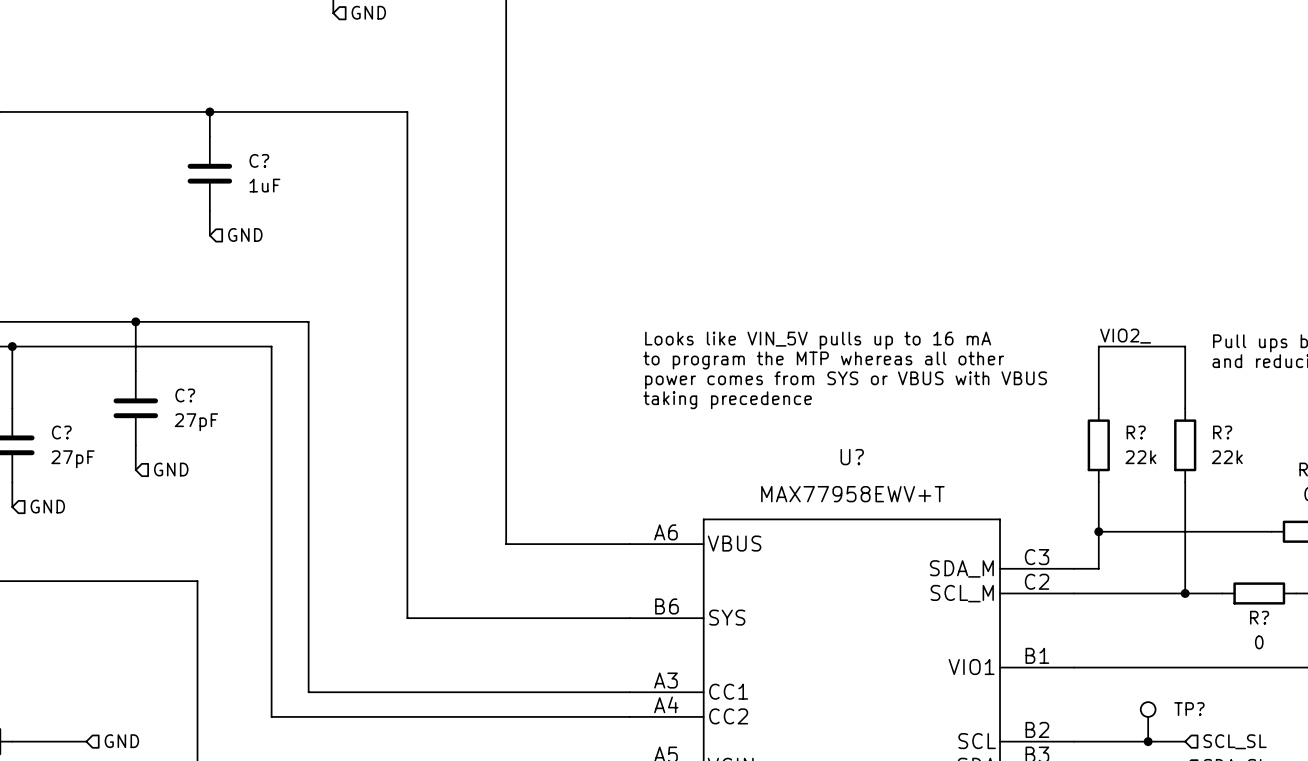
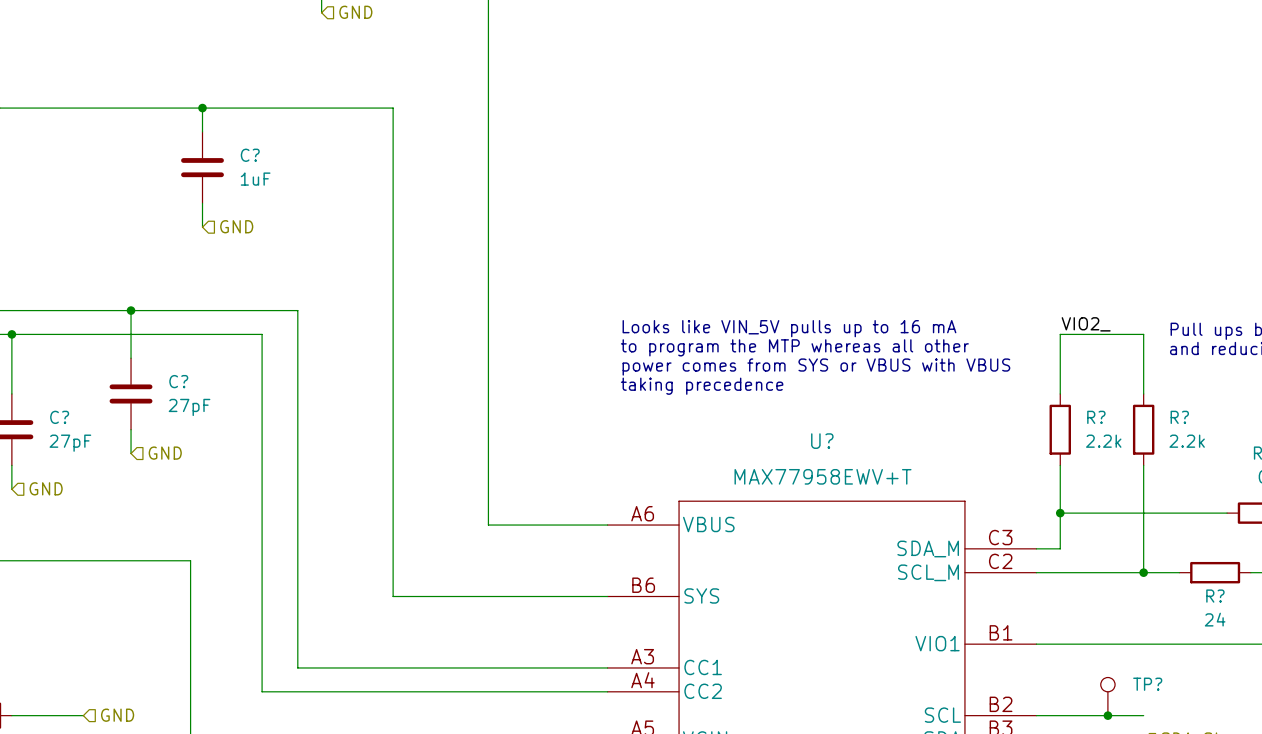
R? value: 22k (1140, 457) -> 2.2k (1103, 441)
R? value: 22k (1227, 457) -> 2.2k (1187, 441)
R? value: 0 (1259, 642) -> 24 (1215, 619)
hierarchical label: SCL_SL (1235, 741) -> none

